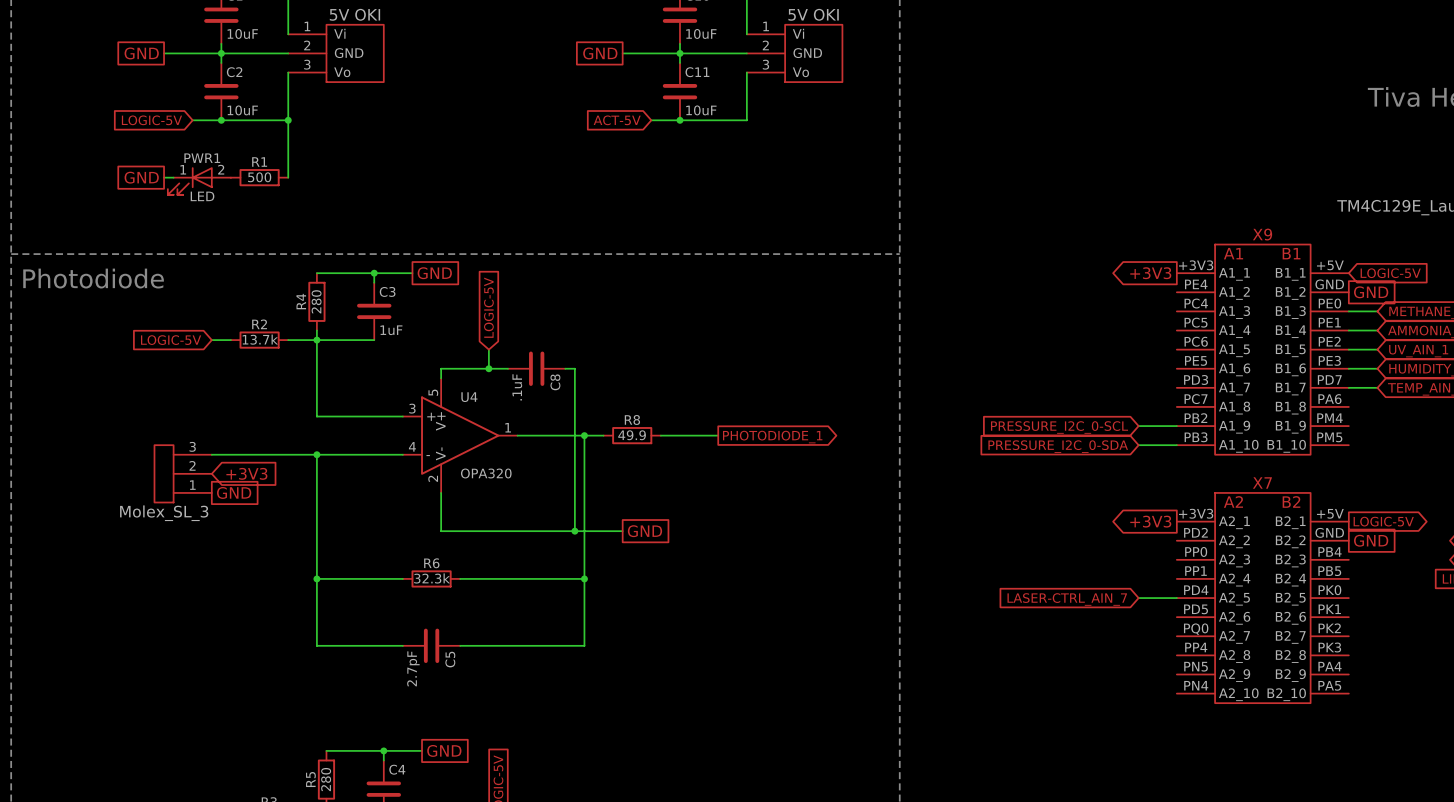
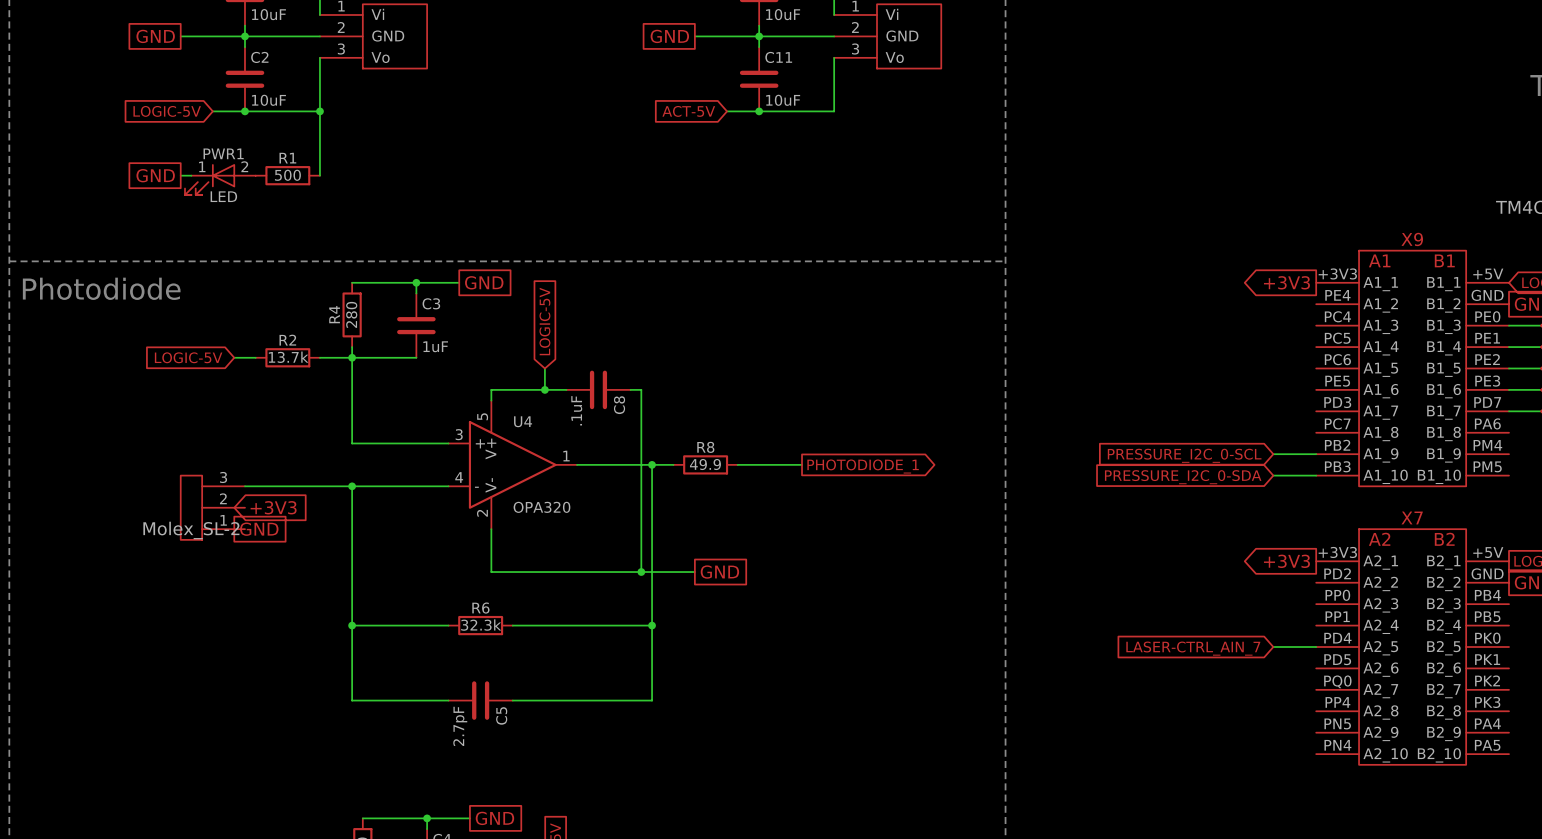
part: Molex_SL_3 (183, 473) -> none
part: none -> Molex_SL-2 (212, 507)

